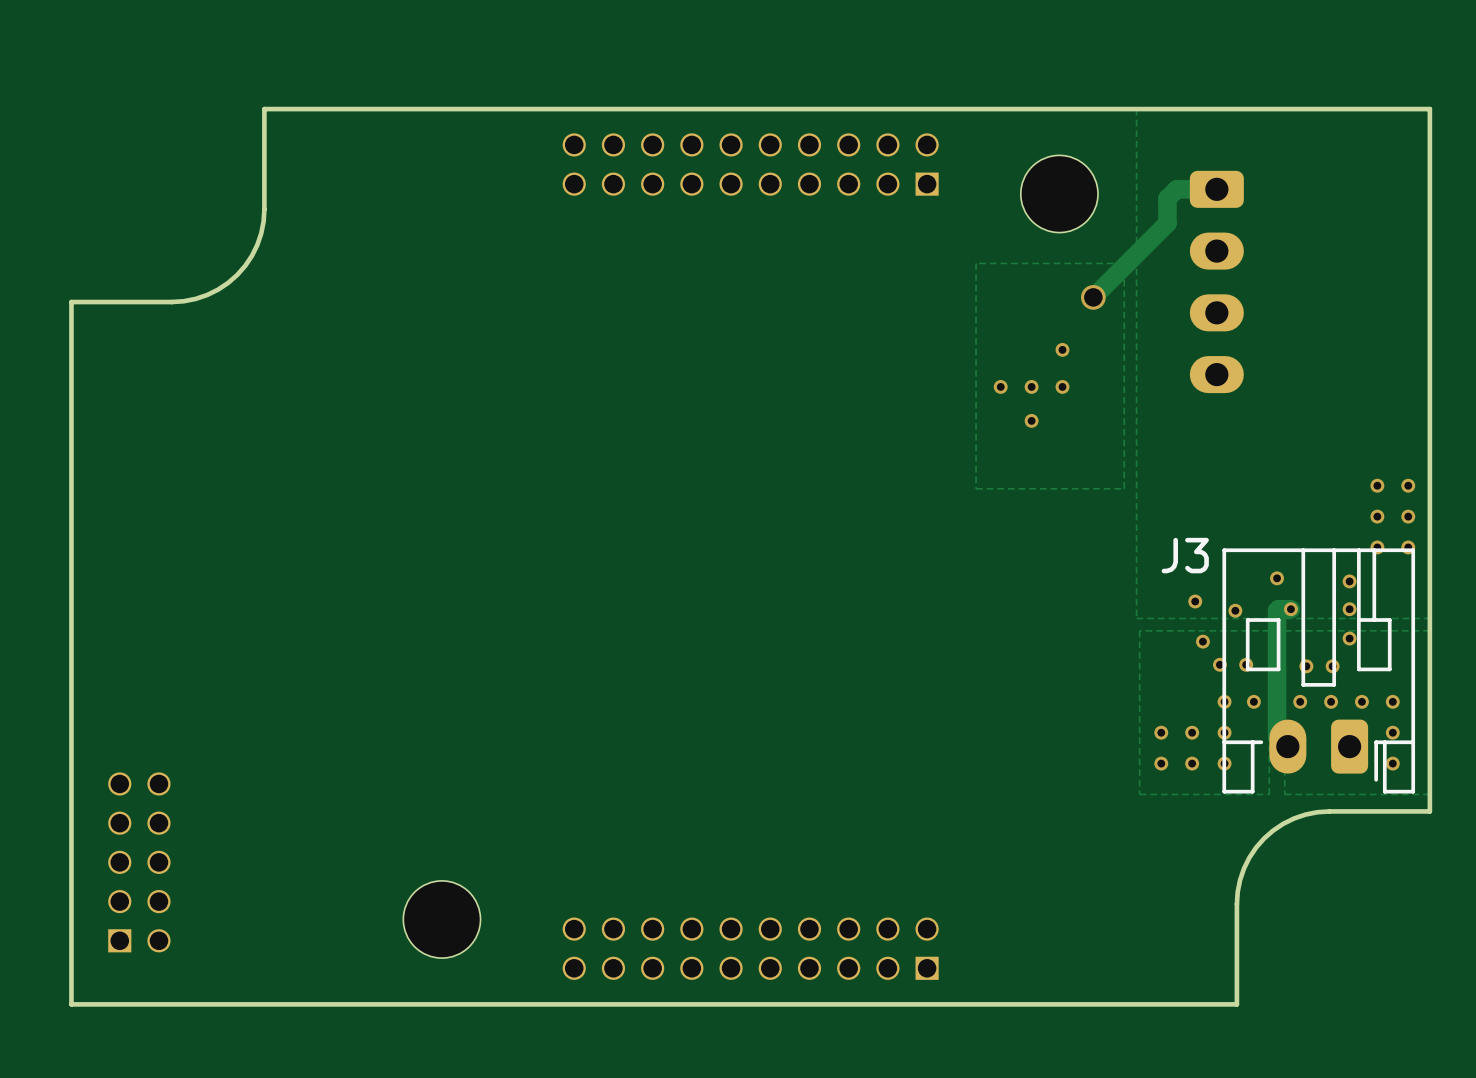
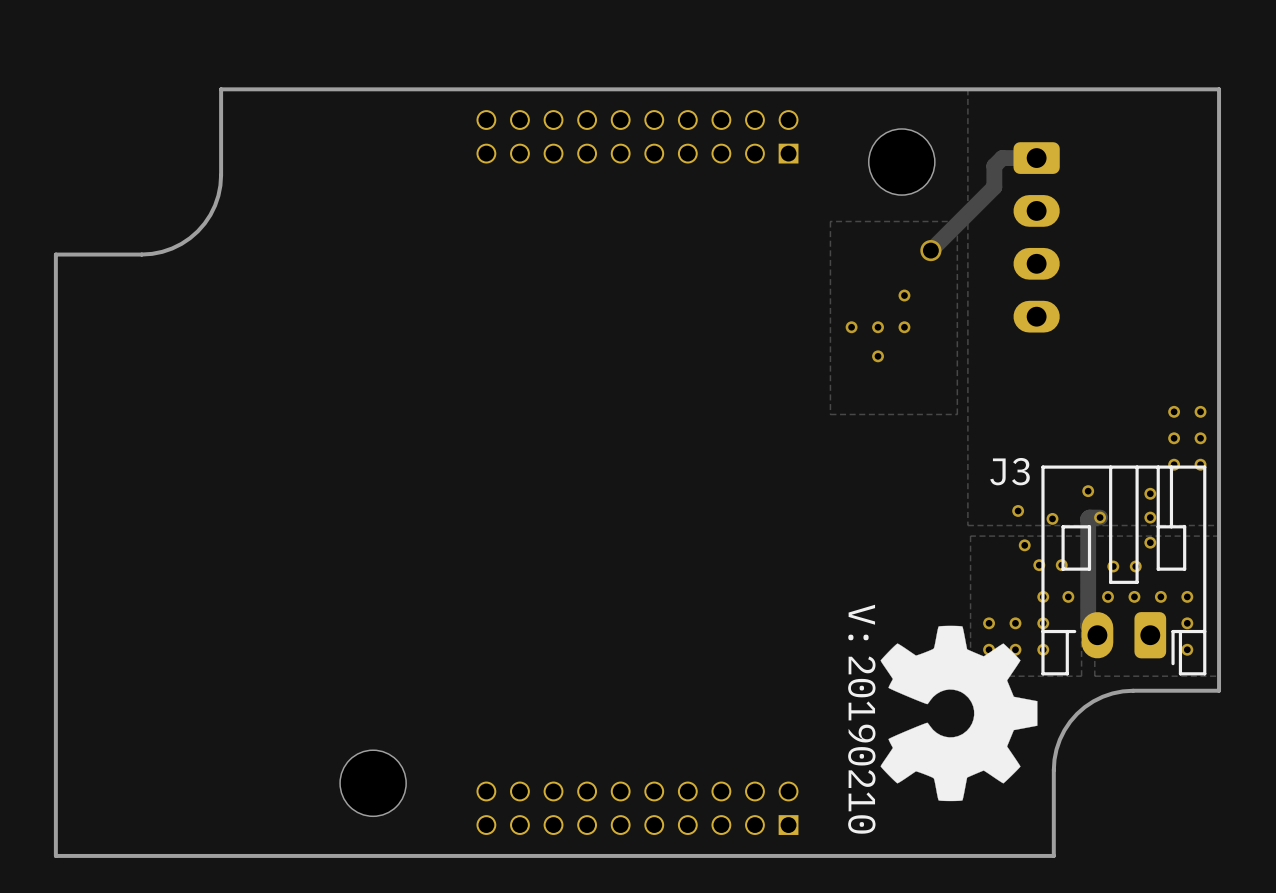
drawing: none -> [880, 625, 1038, 802]
part: (139, 862) -> none

